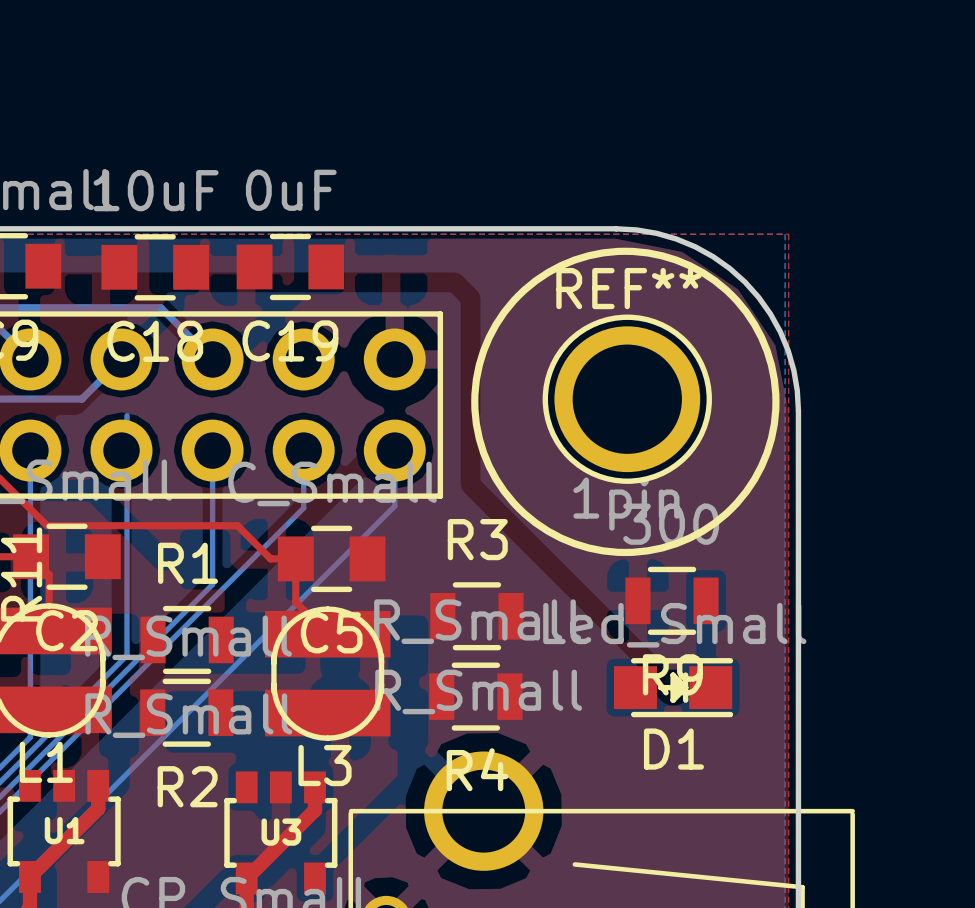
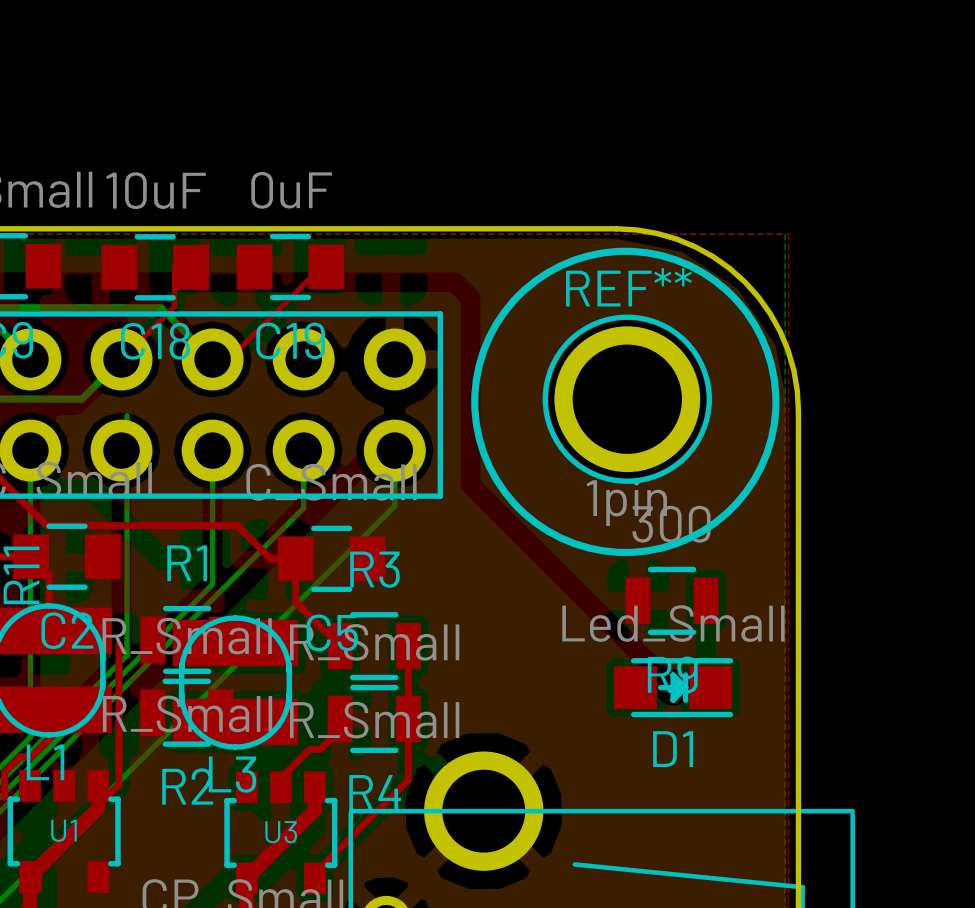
top track: none -> (319, 264) (319, 268) (228, 359) (212, 359)
top track: none -> (174, 265) (174, 306) (121, 359)
R3 position: (476, 616) -> (374, 646)
top track: none -> (118, 644) (118, 784) (38, 865) (38, 888)
top track: none -> (408, 646) (408, 780) (315, 873) (315, 878)
L3 position: (327, 673) -> (235, 682)
R4 position: (475, 696) -> (374, 718)
top track: none -> (340, 718) (340, 729) (320, 749) (309, 749) (280, 778) (280, 787)
top track: none -> (50, 726) (50, 737) (31, 756) (20, 756) (4, 772) (4, 797)

